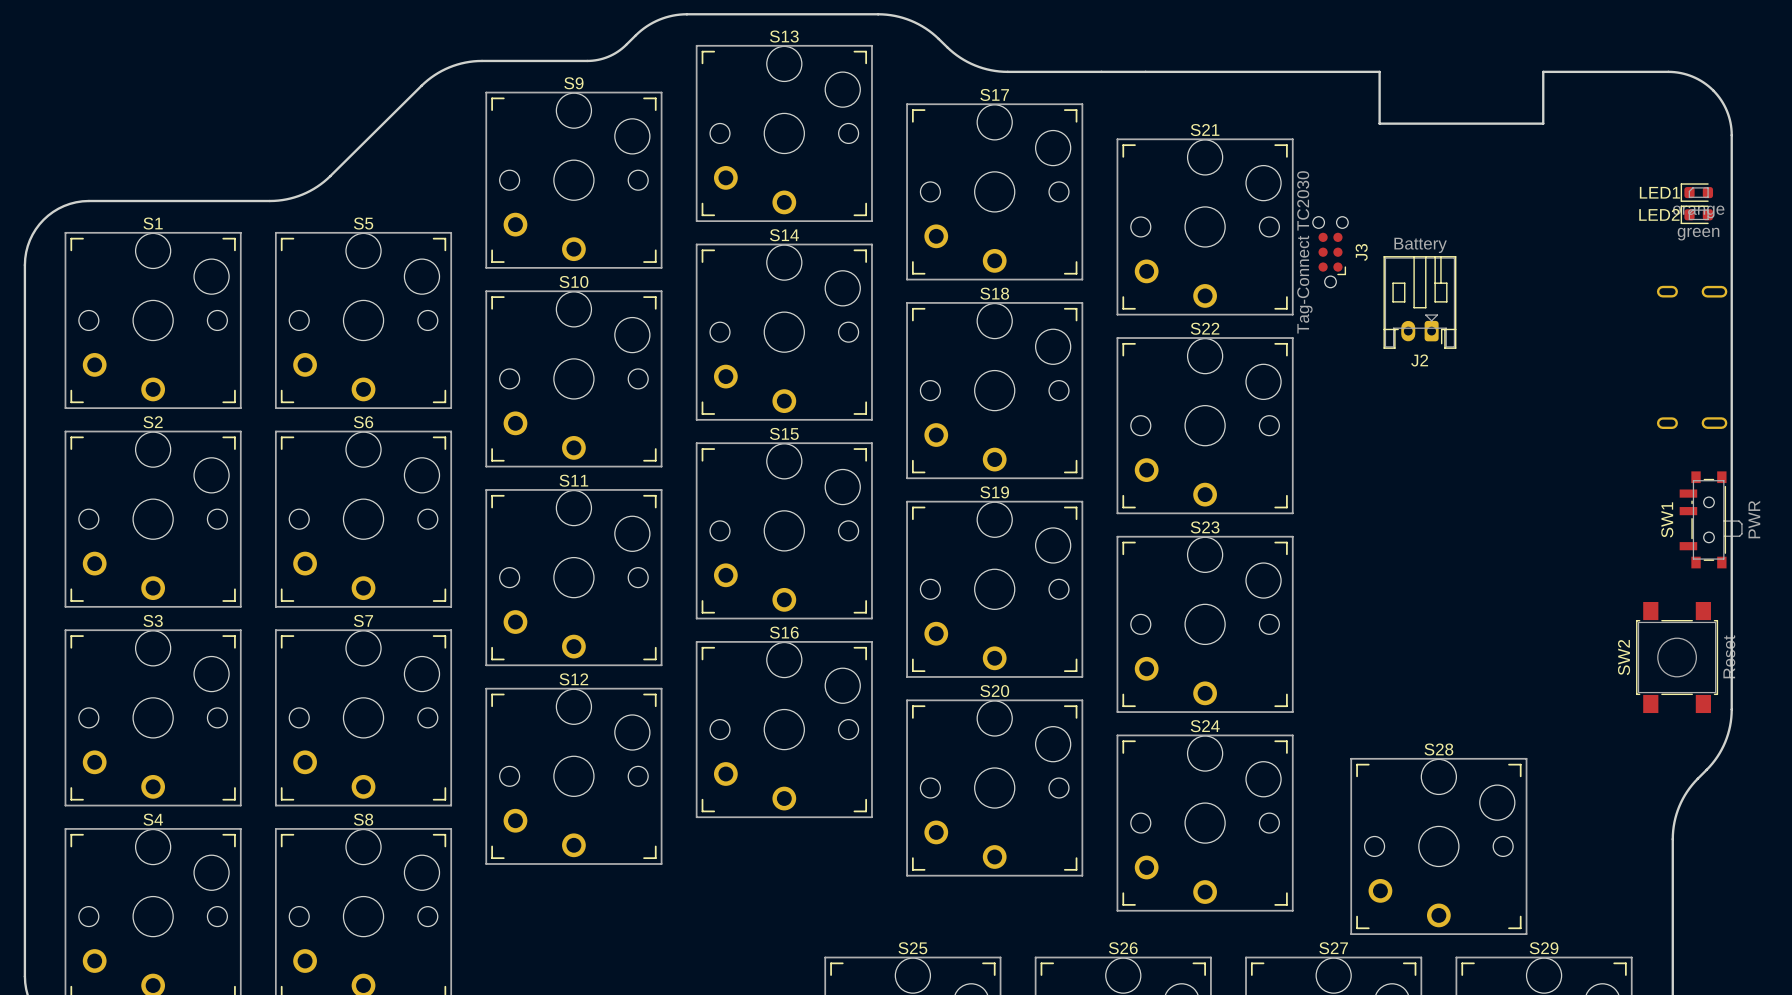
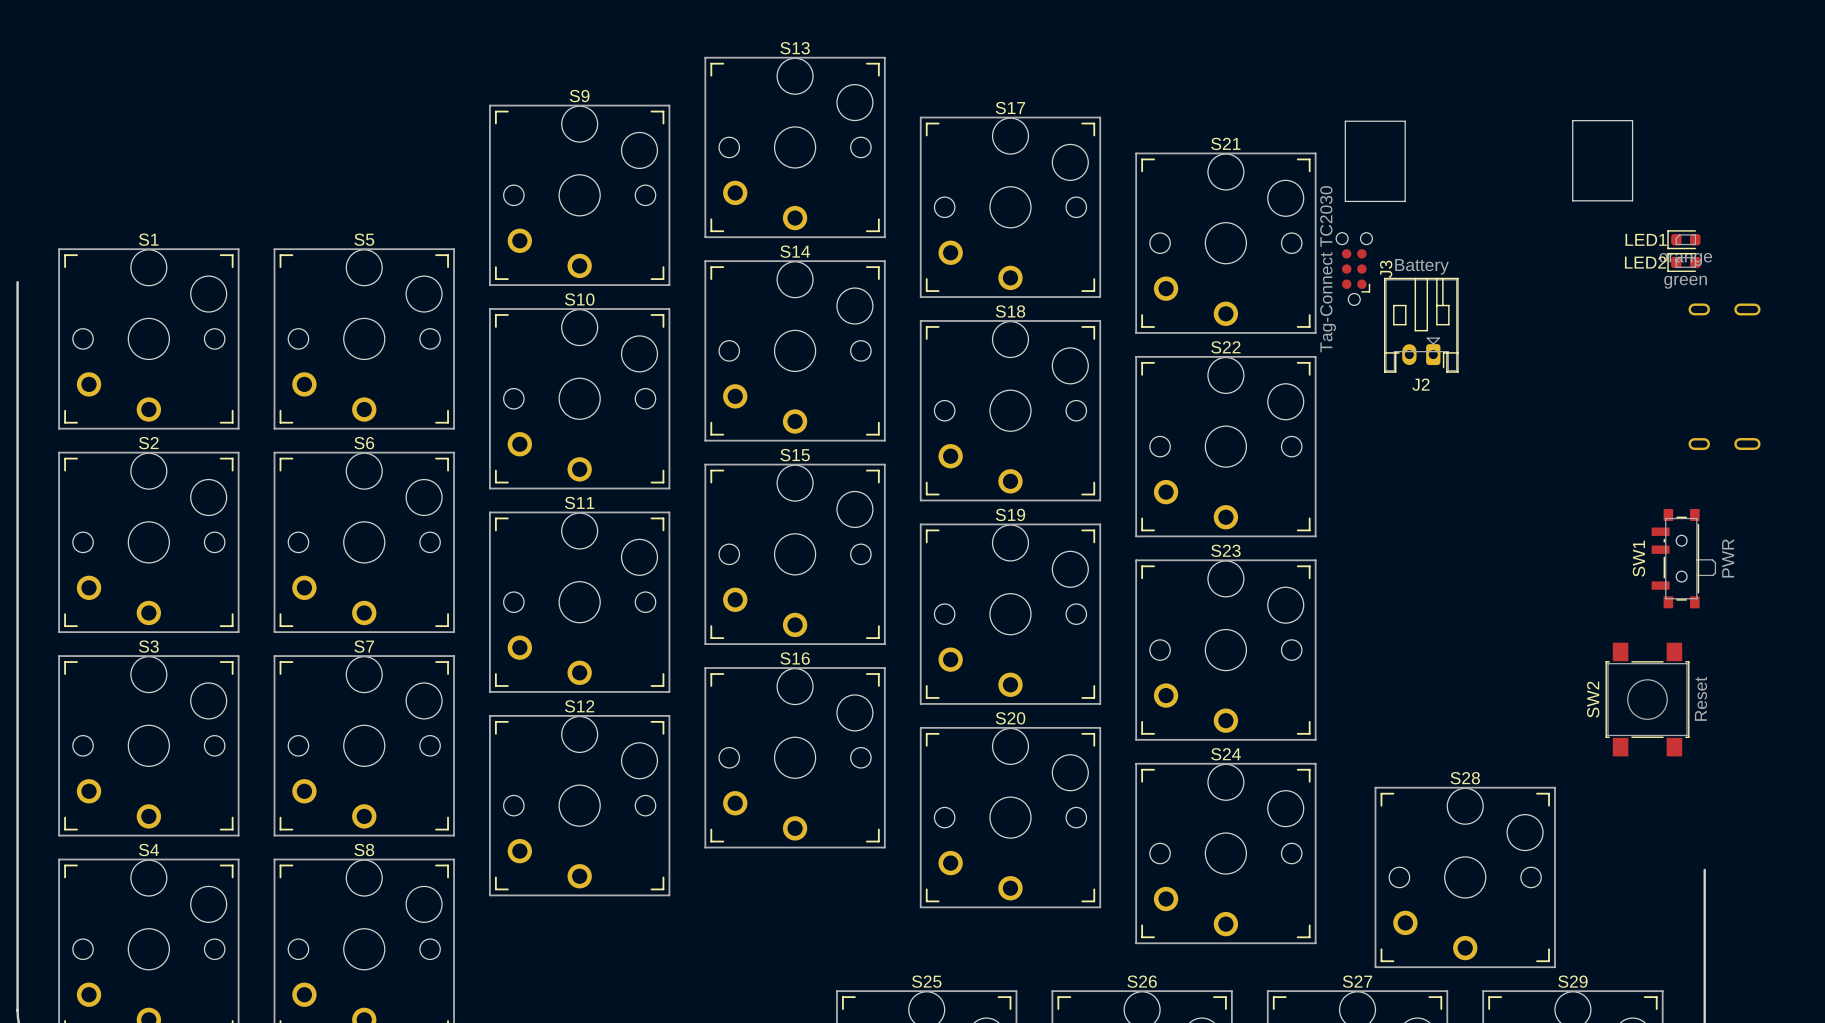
board edge: none -> (1345, 121) (1405, 121) (1405, 201) (1345, 201) (1345, 121)
board edge: none -> (1572, 120) (1632, 120) (1632, 200) (1572, 200) (1572, 120)
LED1 position: (1696, 192) -> (1683, 239)
LED2 position: (1696, 214) -> (1683, 262)
board edge: (24, 265) (27, 246) (35, 229) (48, 215) (64, 206) (88, 201) (269, 201) (294, 197) (310, 191) (324, 181) (424, 82) (445, 69) (461, 63) (477, 61) (600, 59) (619, 50) (649, 24) (665, 17) (679, 14) (878, 14) (894, 15) (910, 20) (925, 28) (953, 52) (967, 61) (982, 68) (999, 71) (1379, 71) (1379, 123) (1543, 123) (1543, 71) (1671, 71) (1689, 75) (1706, 84) (1719, 97) (1728, 113) (1731, 132) (1731, 709) (1730, 726) (1723, 745) (1714, 760) (1692, 785) (1682, 798) (1675, 818) (1672, 839) -> none
J2 position: (1419, 302) -> (1421, 325)
SW1 position: (1711, 519) -> (1683, 558)
SW2 position: (1677, 657) -> (1647, 699)

